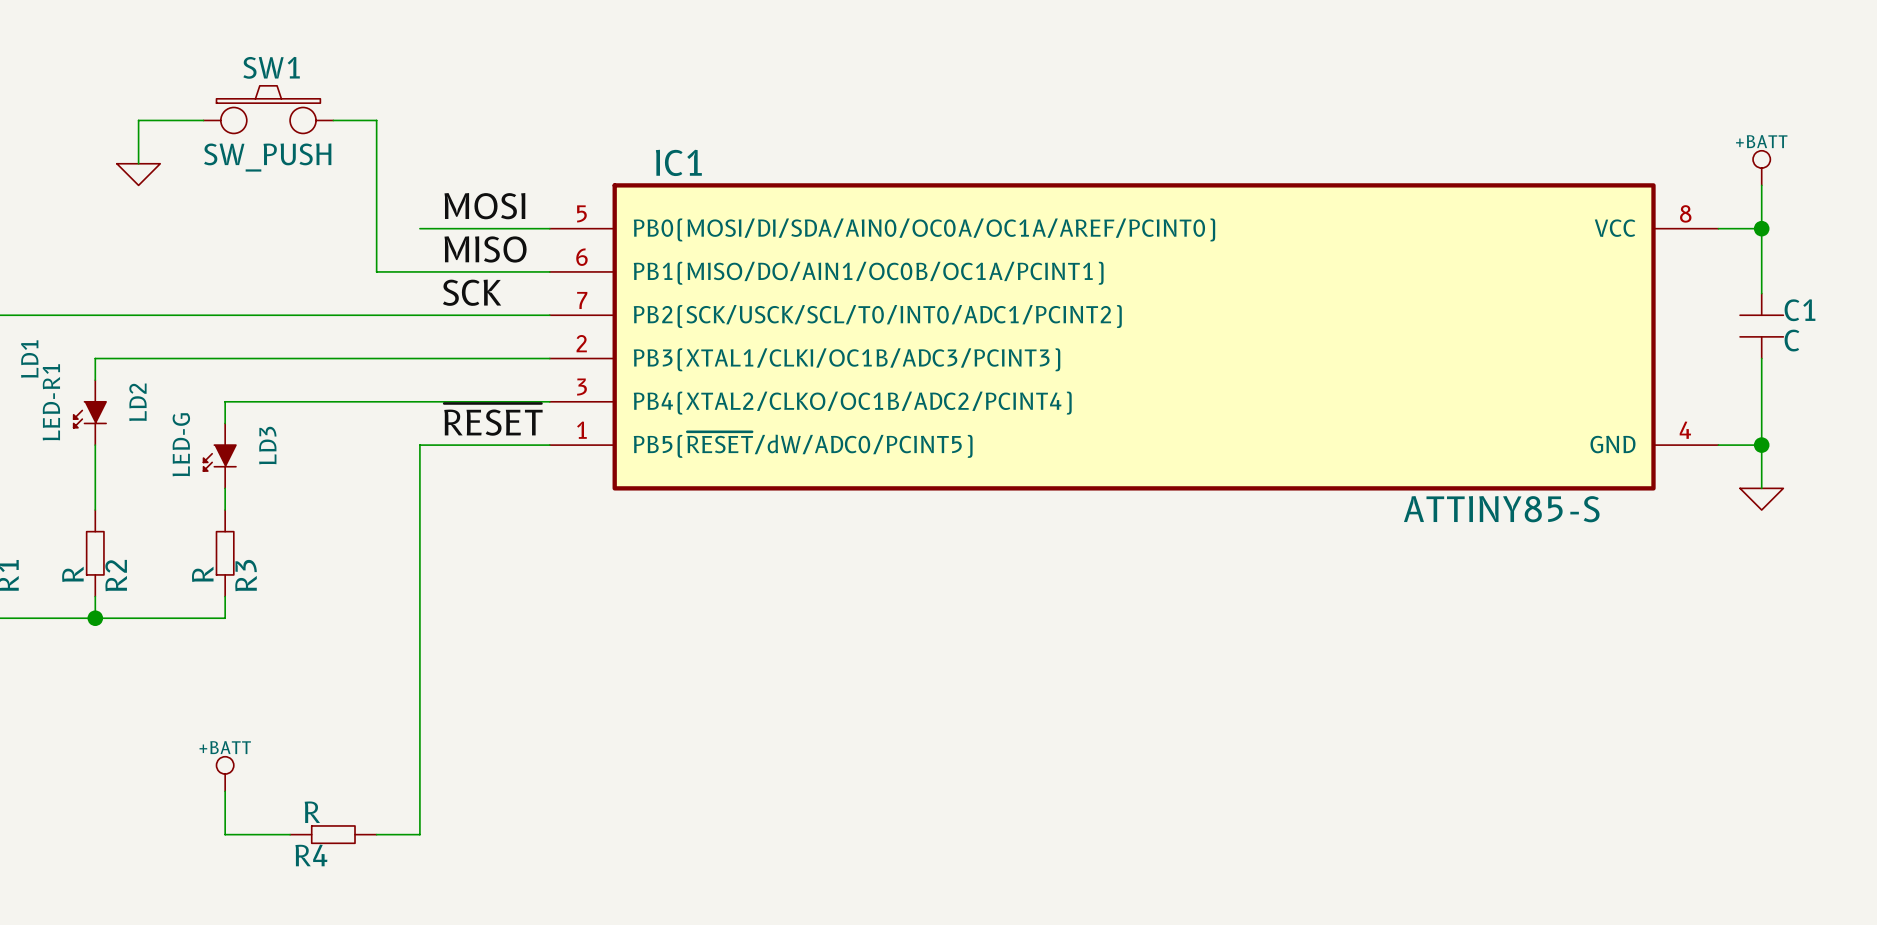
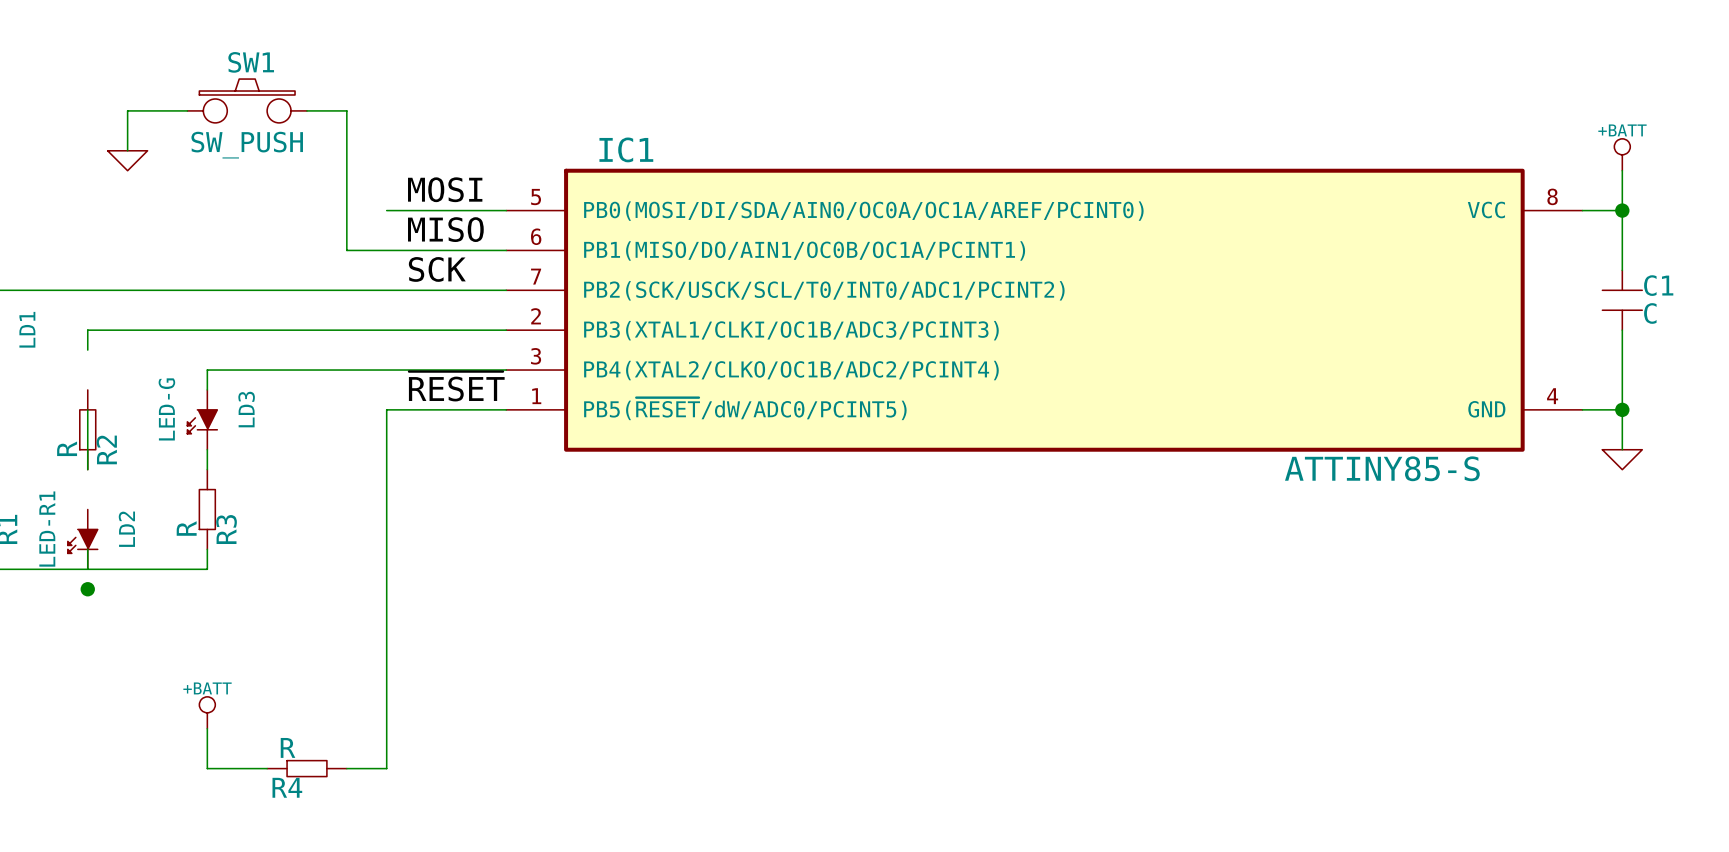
LD2 position: (89, 412) -> (82, 539)
R2 position: (95, 553) -> (87, 429)
junction position: (95, 618) -> (87, 589)

